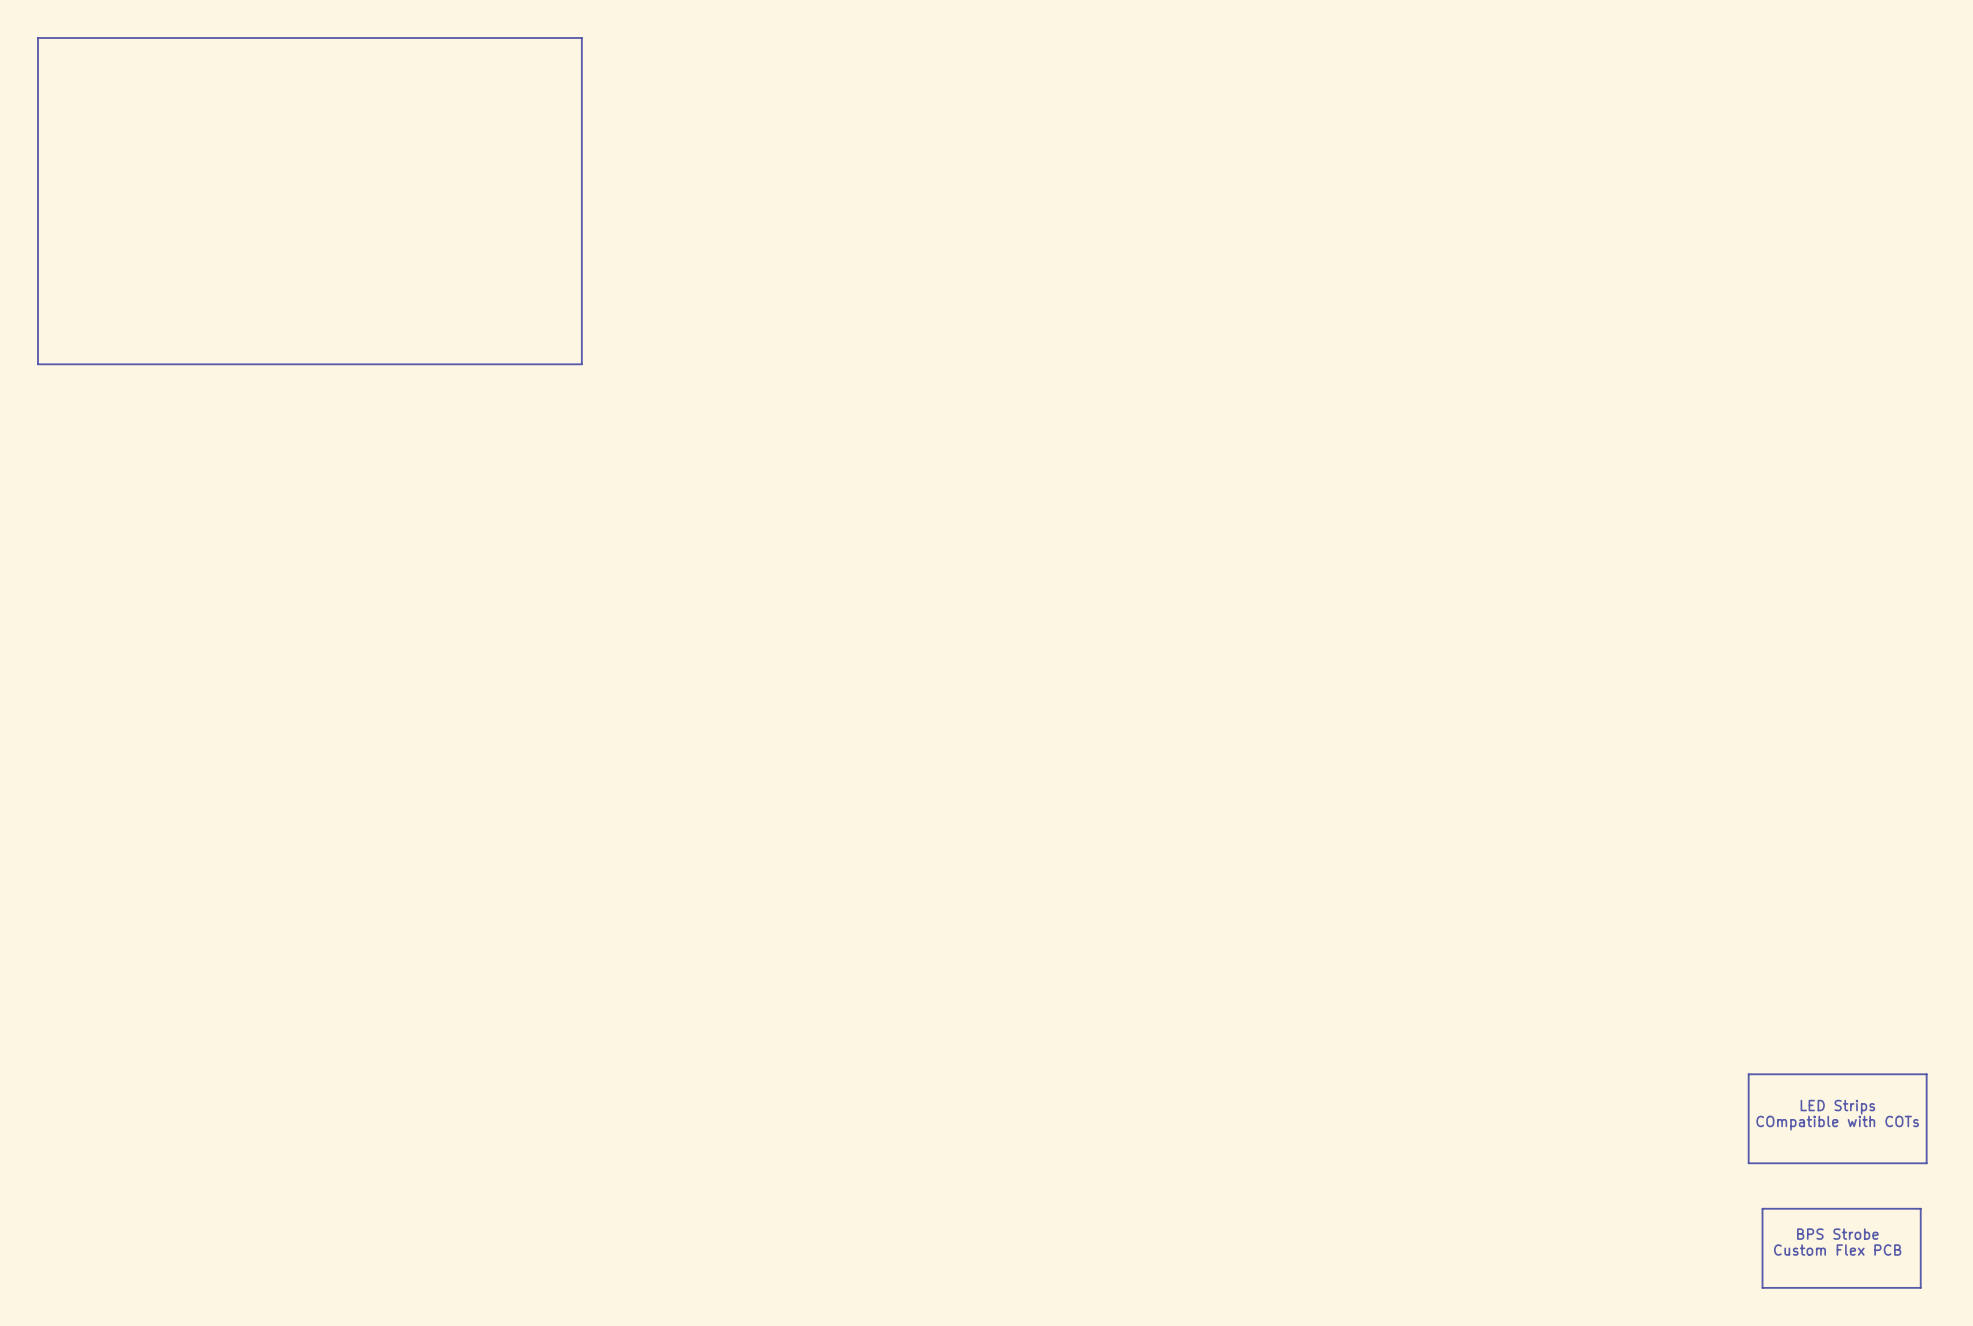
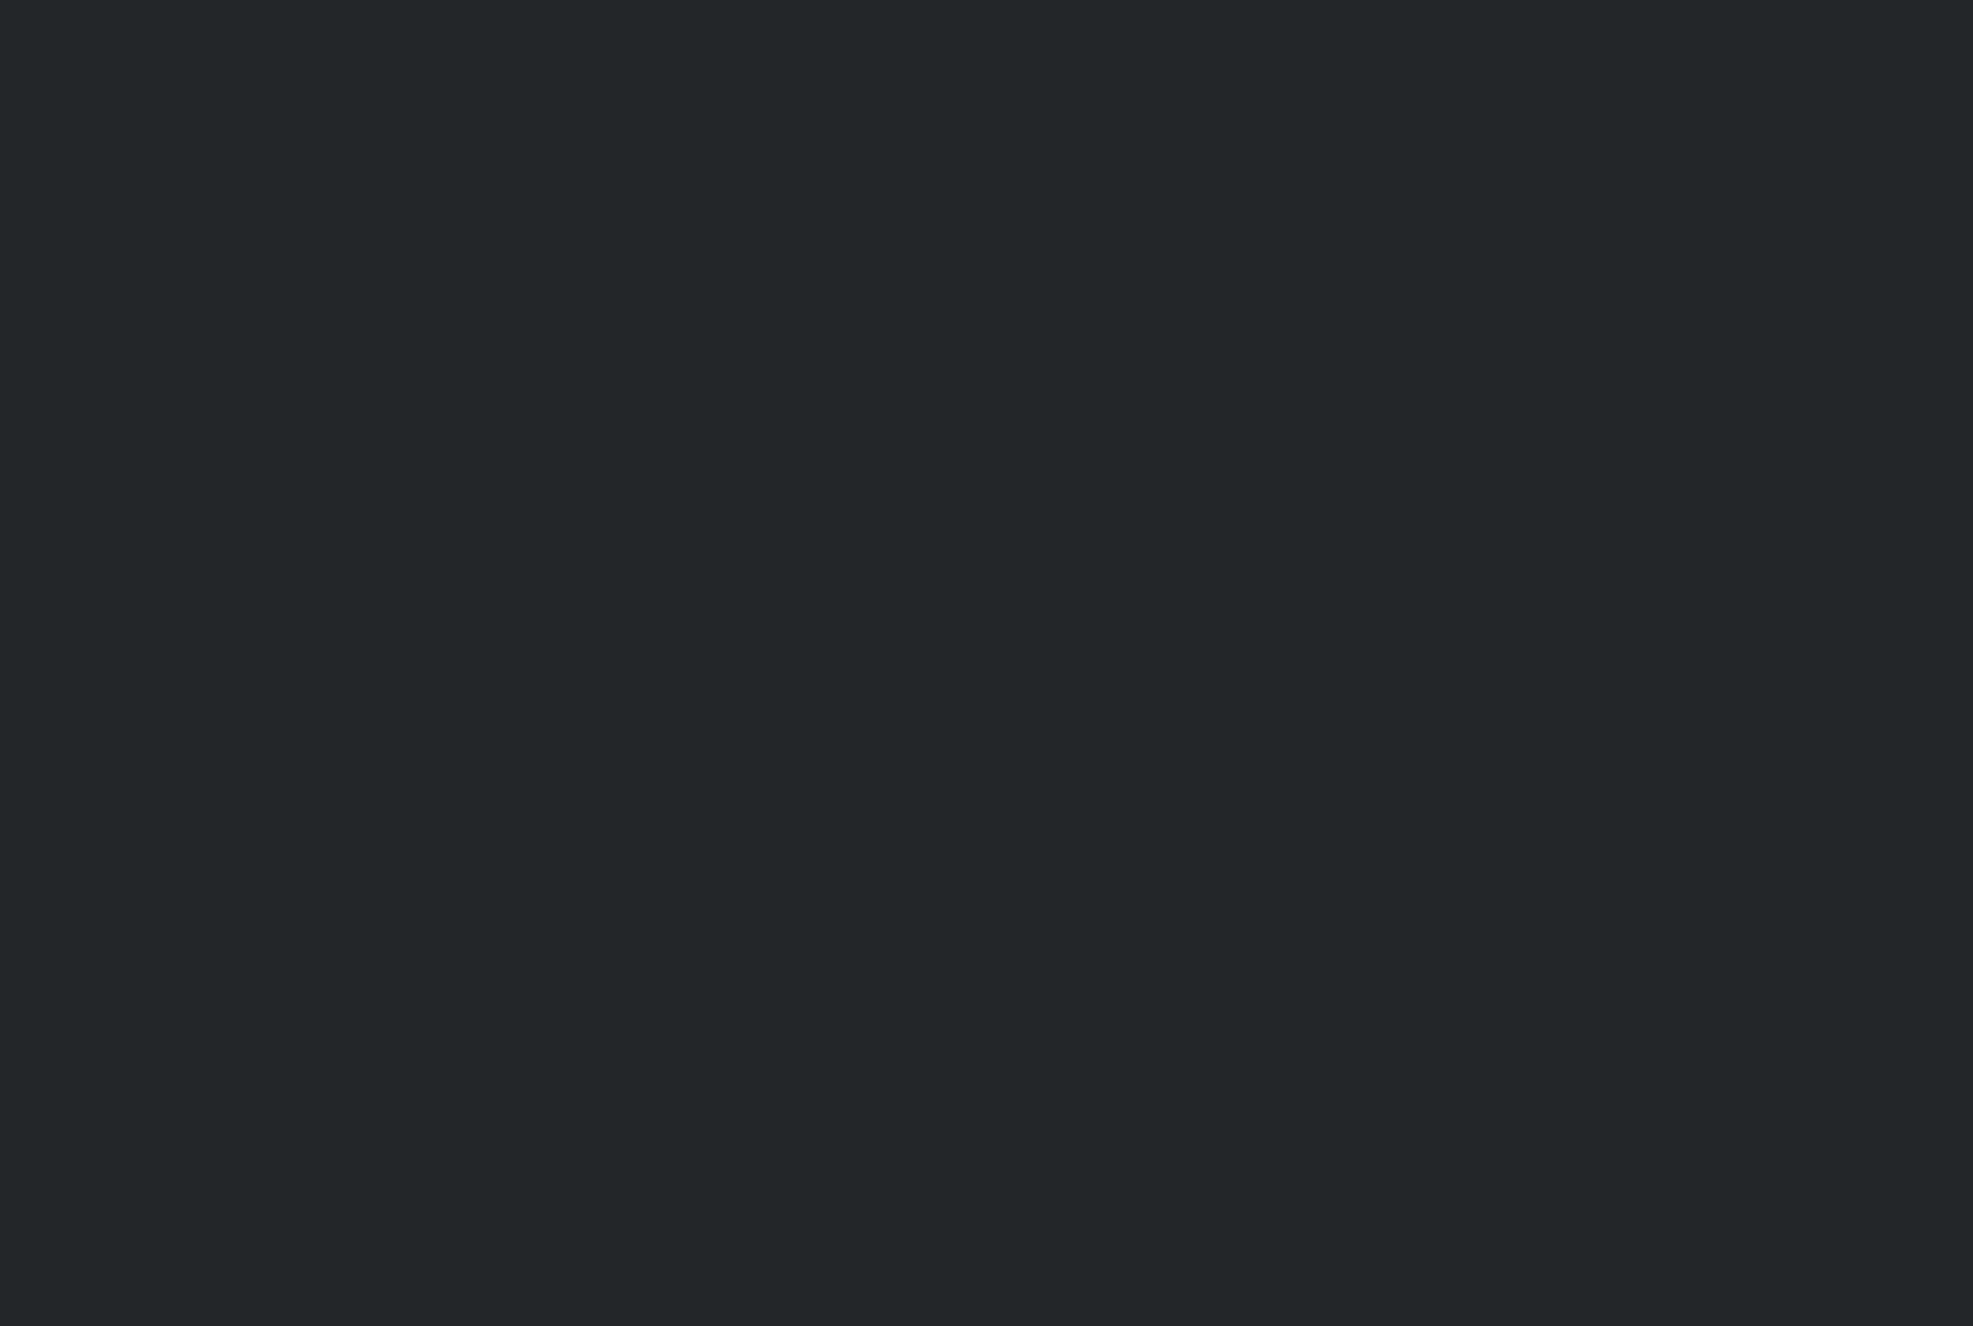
line: (37, 37) (581, 37) (581, 364) (37, 364) (37, 37) -> none
line: (1748, 1074) (1926, 1074) (1926, 1163) (1748, 1163) (1748, 1074) -> none
text: LED Strips (1837, 1107) -> none
text: COmpatible with COTs (1837, 1123) -> none
line: (1762, 1208) (1920, 1208) (1920, 1287) (1762, 1287) (1762, 1208) -> none
text: BPS Strobe (1837, 1234) -> none
text: Custom Flex PCB (1837, 1250) -> none

